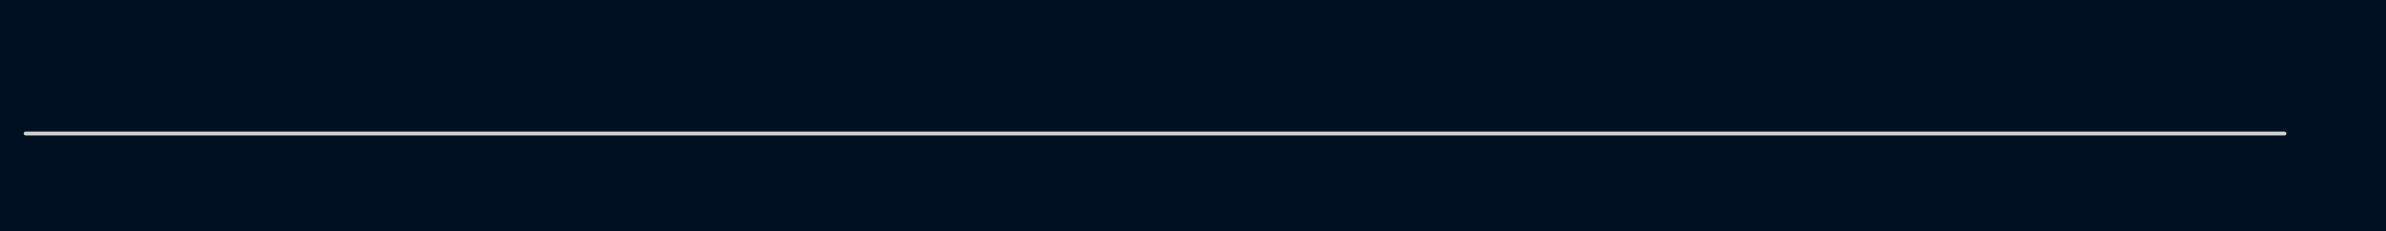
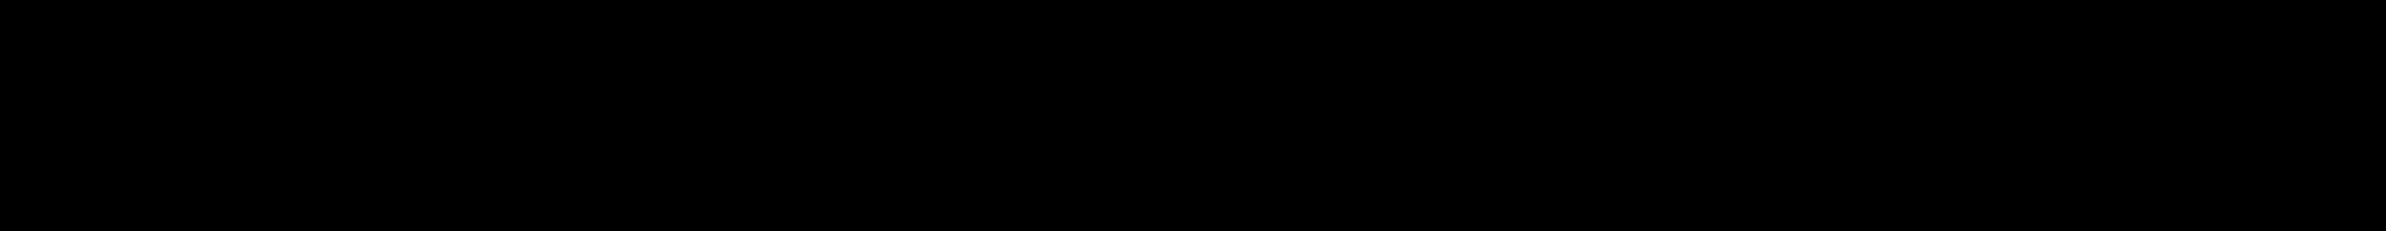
board edge: (25, 133) (2284, 133) -> none

